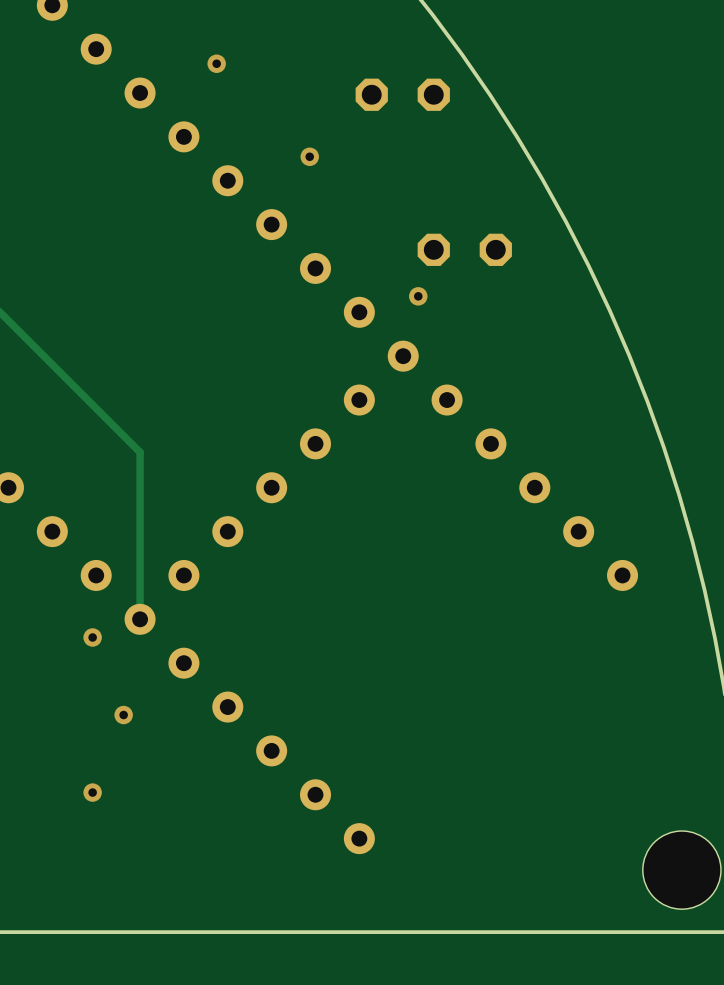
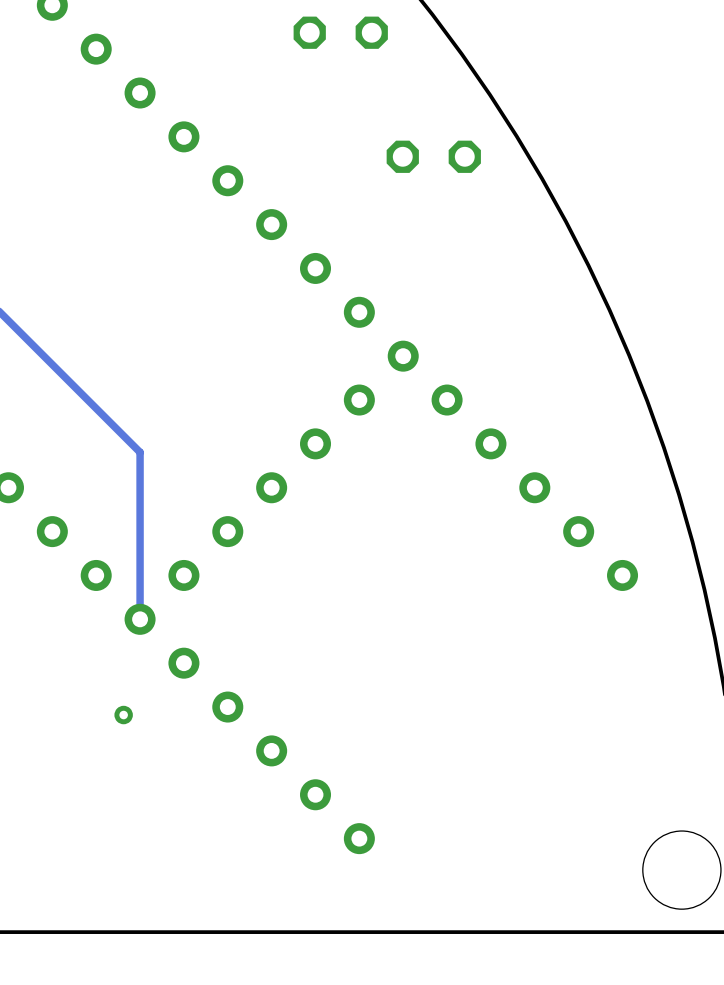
part: none -> (340, 32)
via: (216, 63) -> none
part: (402, 94) -> none
via: (309, 156) -> none
part: none -> (433, 156)
part: (464, 249) -> none
via: (418, 296) -> none
via: (92, 637) -> none
via: (92, 792) -> none

